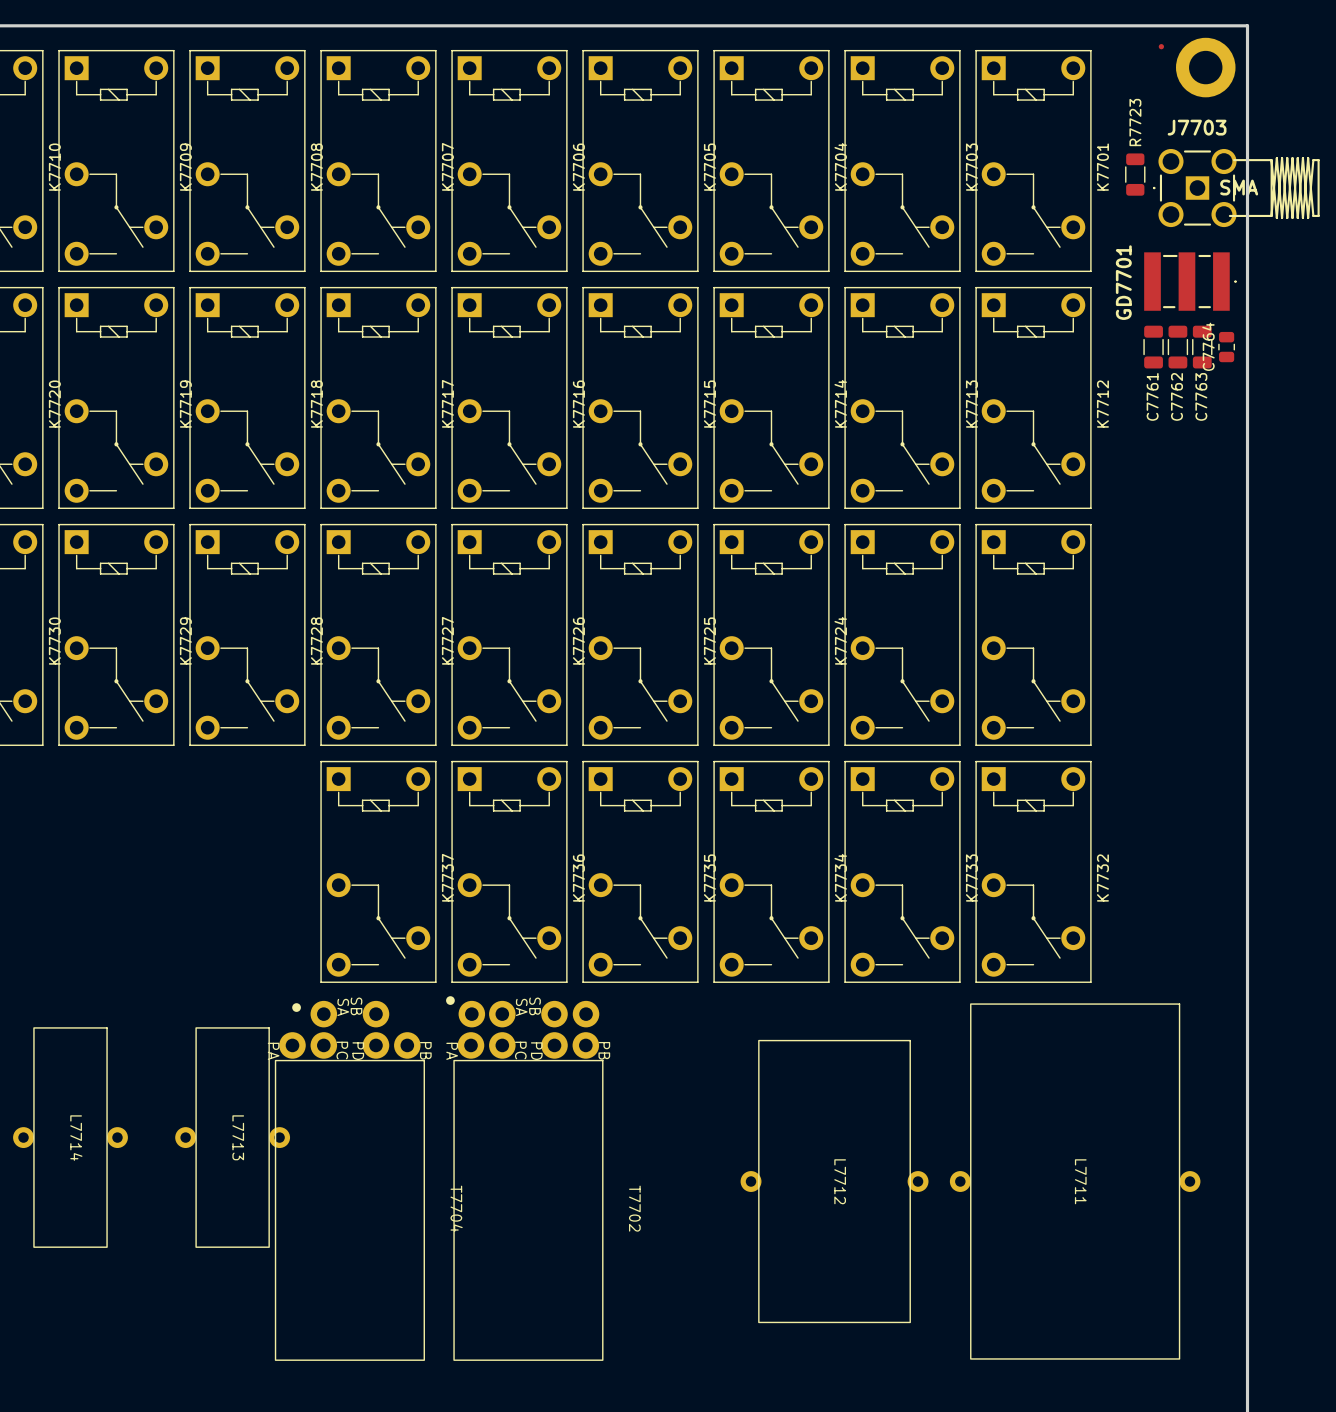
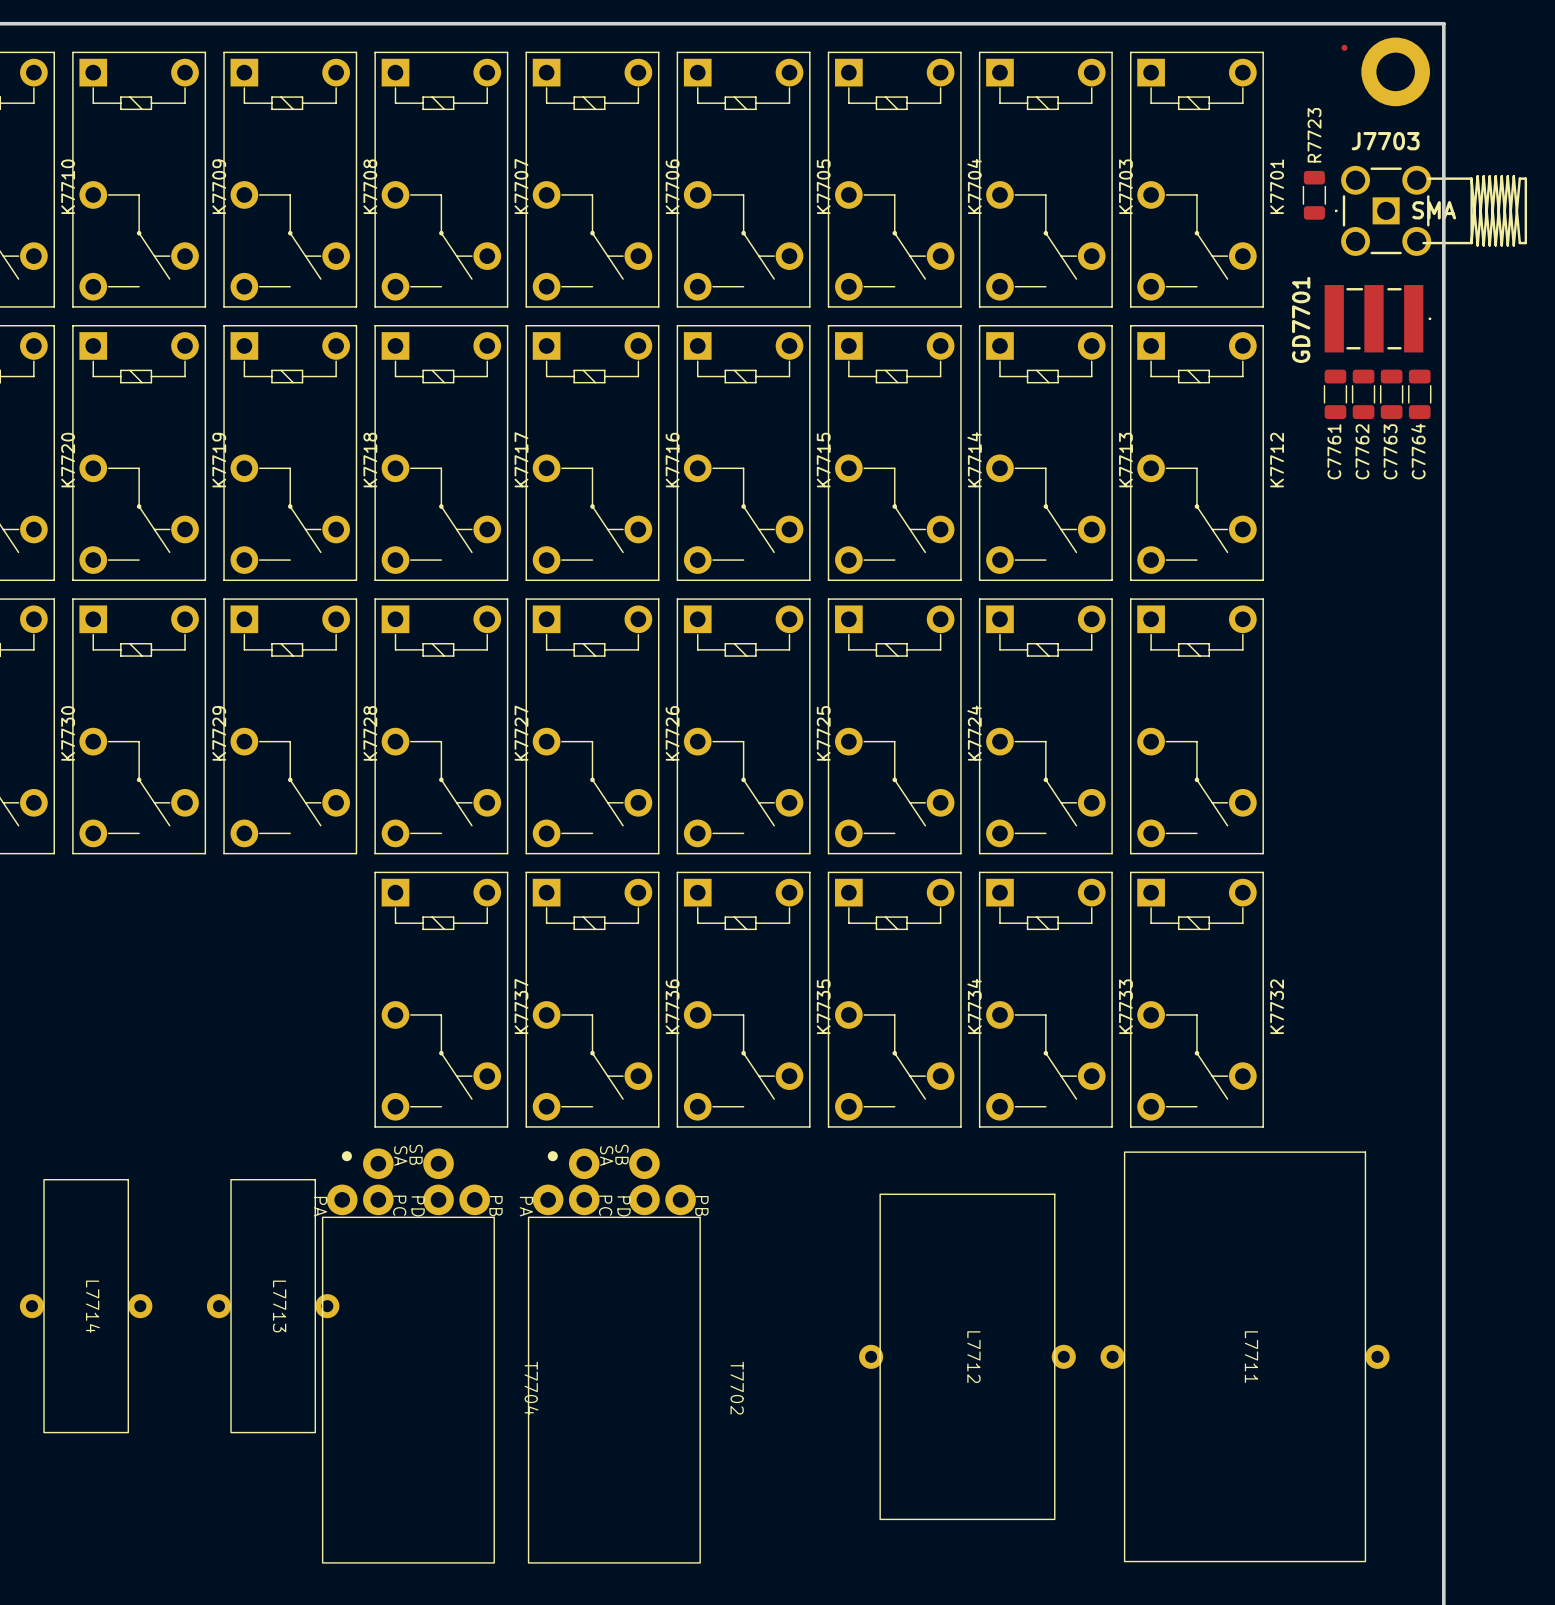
C7764 footprint: [1218, 331, 1235, 363] -> [1408, 369, 1432, 419]
C7764 name position: C7764 (1208, 346) -> C7764 (1418, 451)
T7702 footprint: [446, 996, 604, 1361] -> [527, 1148, 701, 1564]

